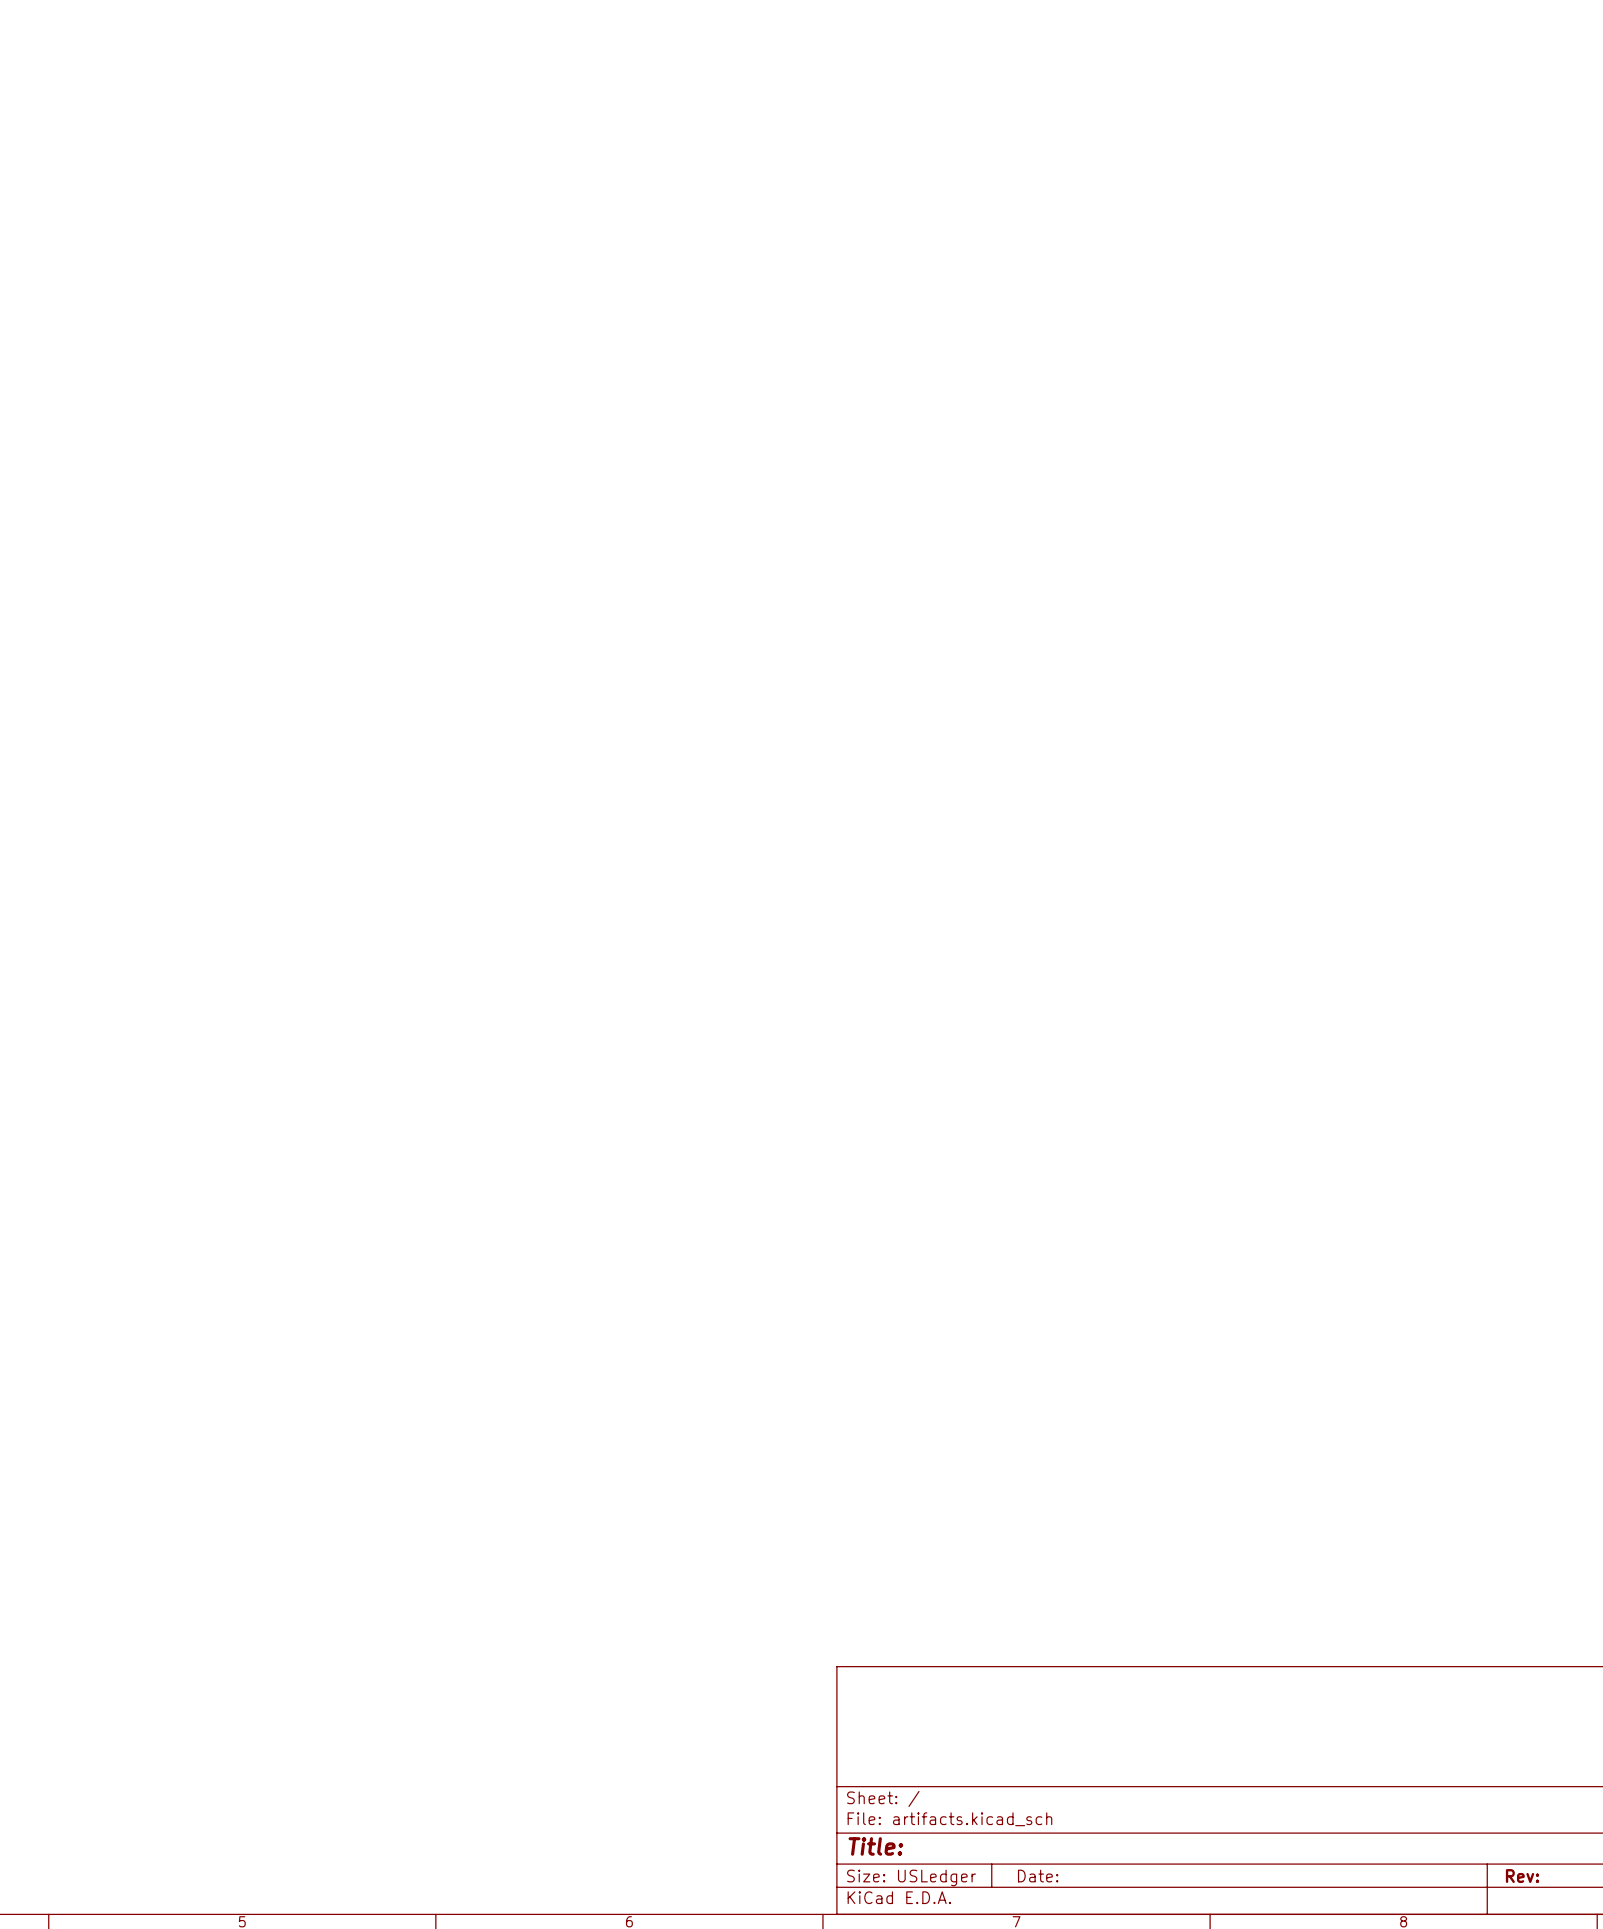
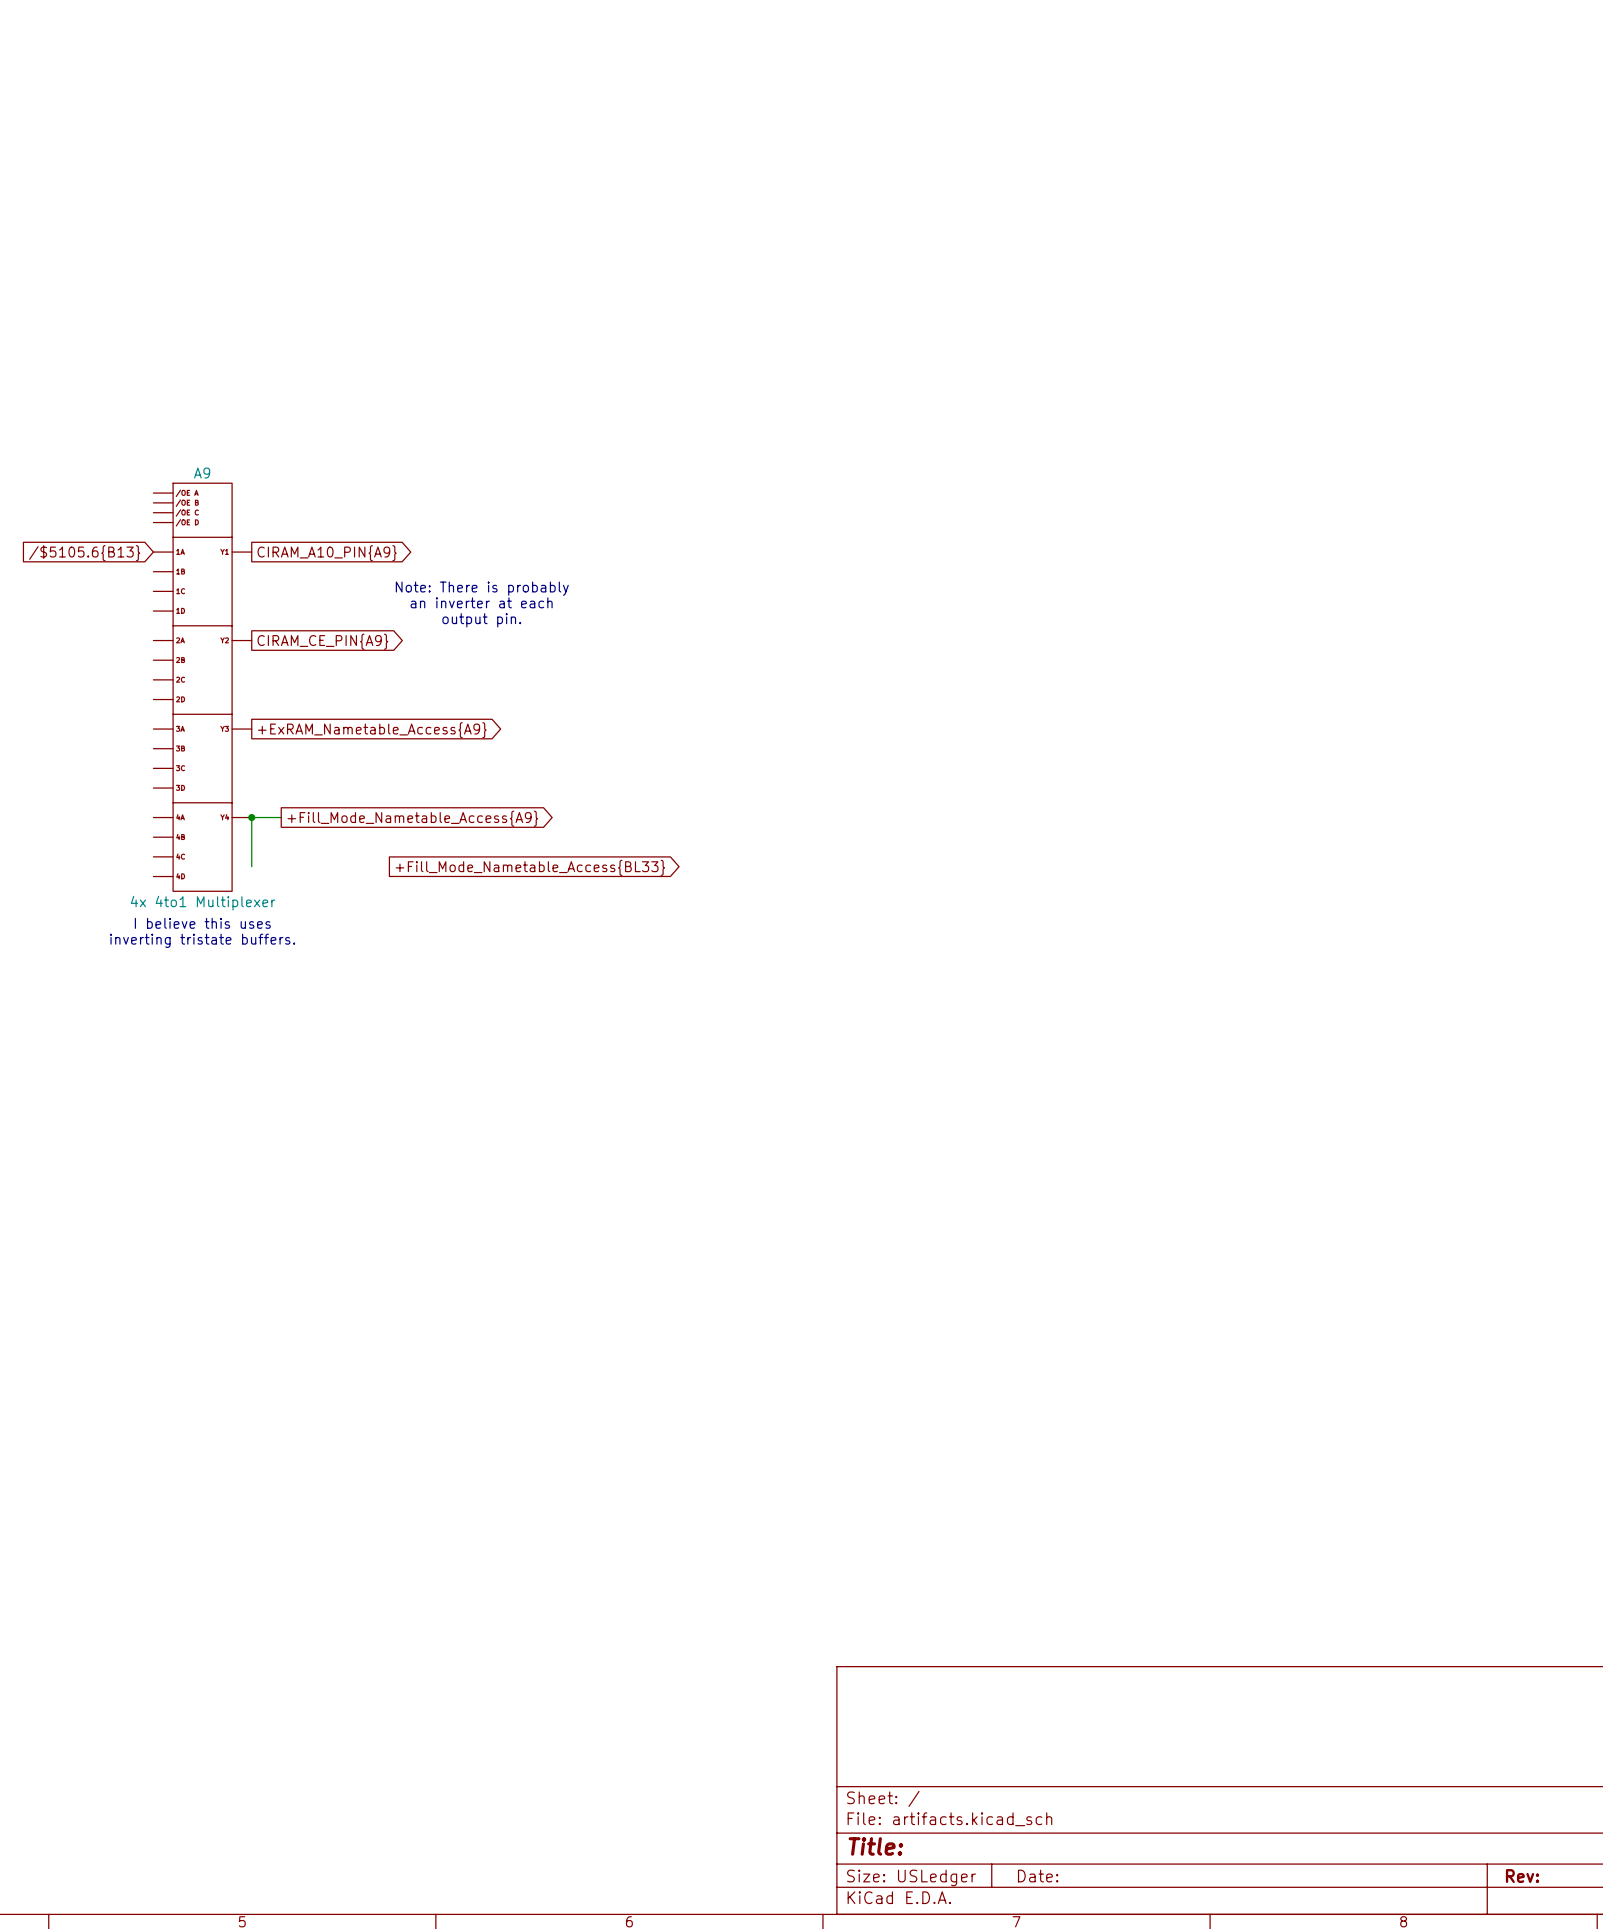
global label: none -> /$5105.6{B13} (84, 553)
global label: none -> CIRAM_A10_PIN{A9} (327, 553)
text: none -> Note: There is probably (482, 588)
text: none -> an inverter at each (481, 602)
text: none -> output pin. (481, 620)
global label: none -> CIRAM_CE_PIN{A9} (322, 641)
A9: none -> 4x 4to1 Multiplexer (202, 687)
global label: none -> +ExRAM_Nametable_Access{A9} (372, 730)
junction: none -> (251, 817)
wire: none -> (281, 817) (251, 817) (251, 866)
global label: none -> +Fill_Mode_Nametable_Access{A9} (412, 818)
global label: none -> +Fill_Mode_Nametable_Access{BL33} (530, 867)
text: none -> I believe this uses (202, 923)
text: none -> inverting tristate buffers. (202, 940)

